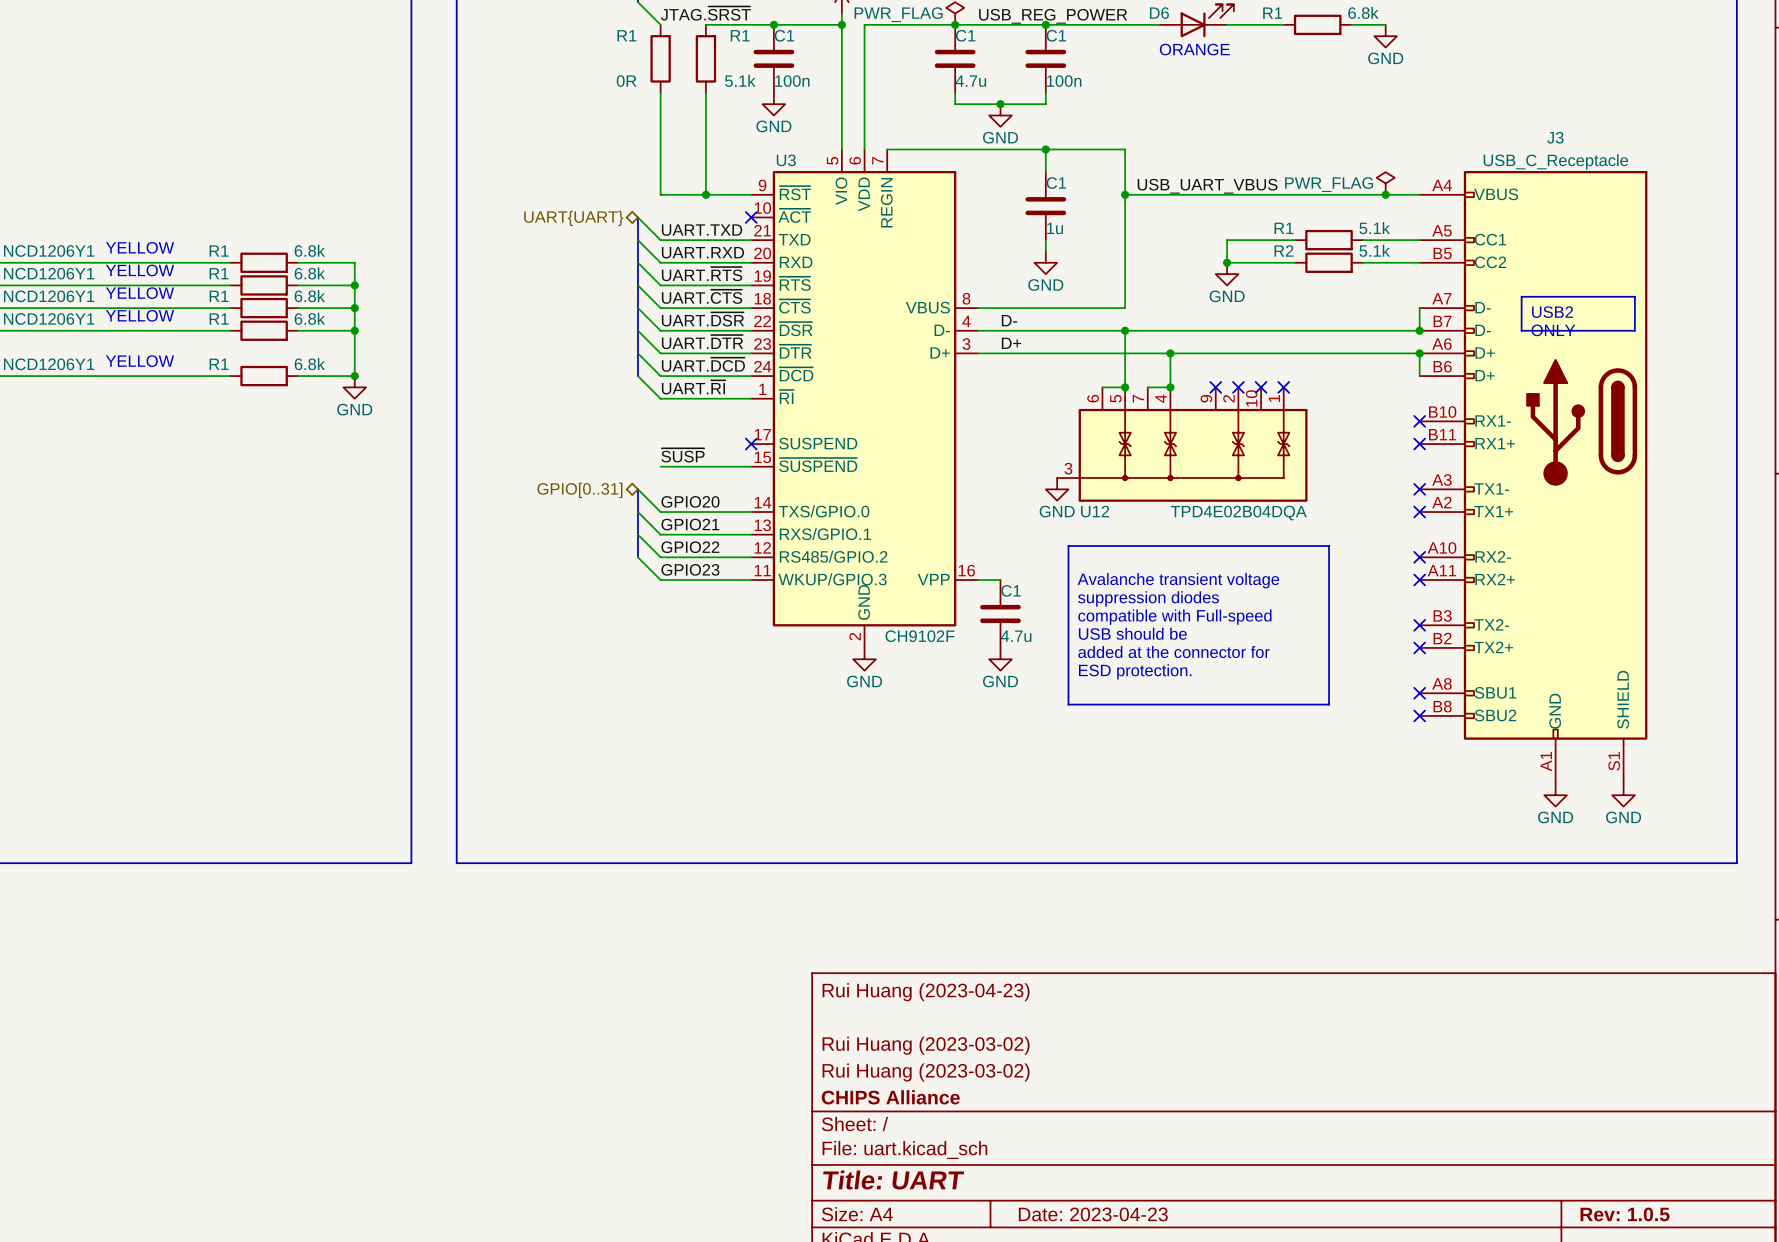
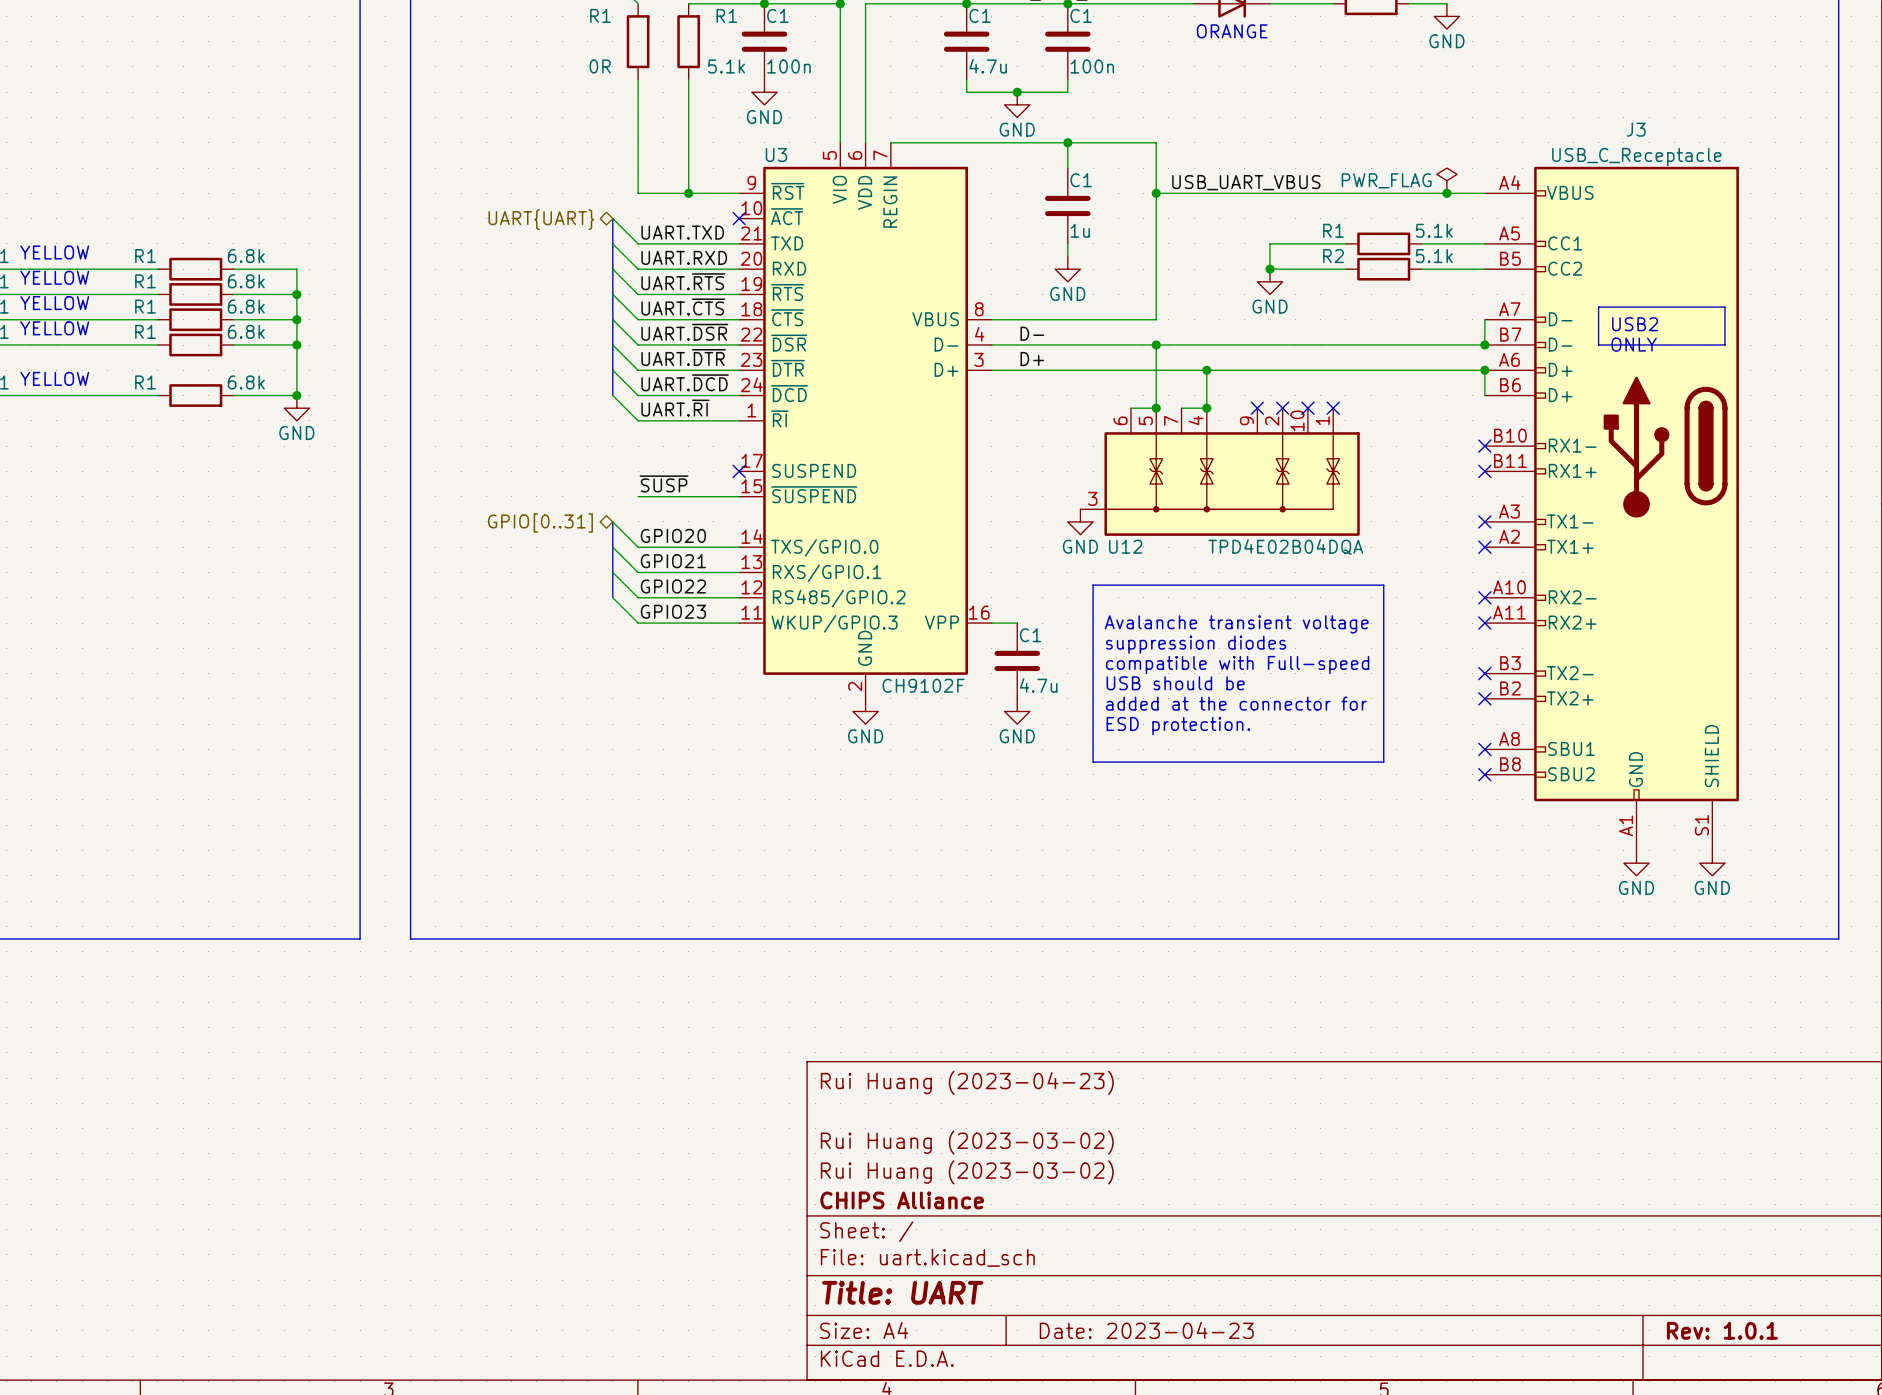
title block: Rev: 1.0.5 (1625, 1214) -> Rev: 1.0.1 (1722, 1330)

